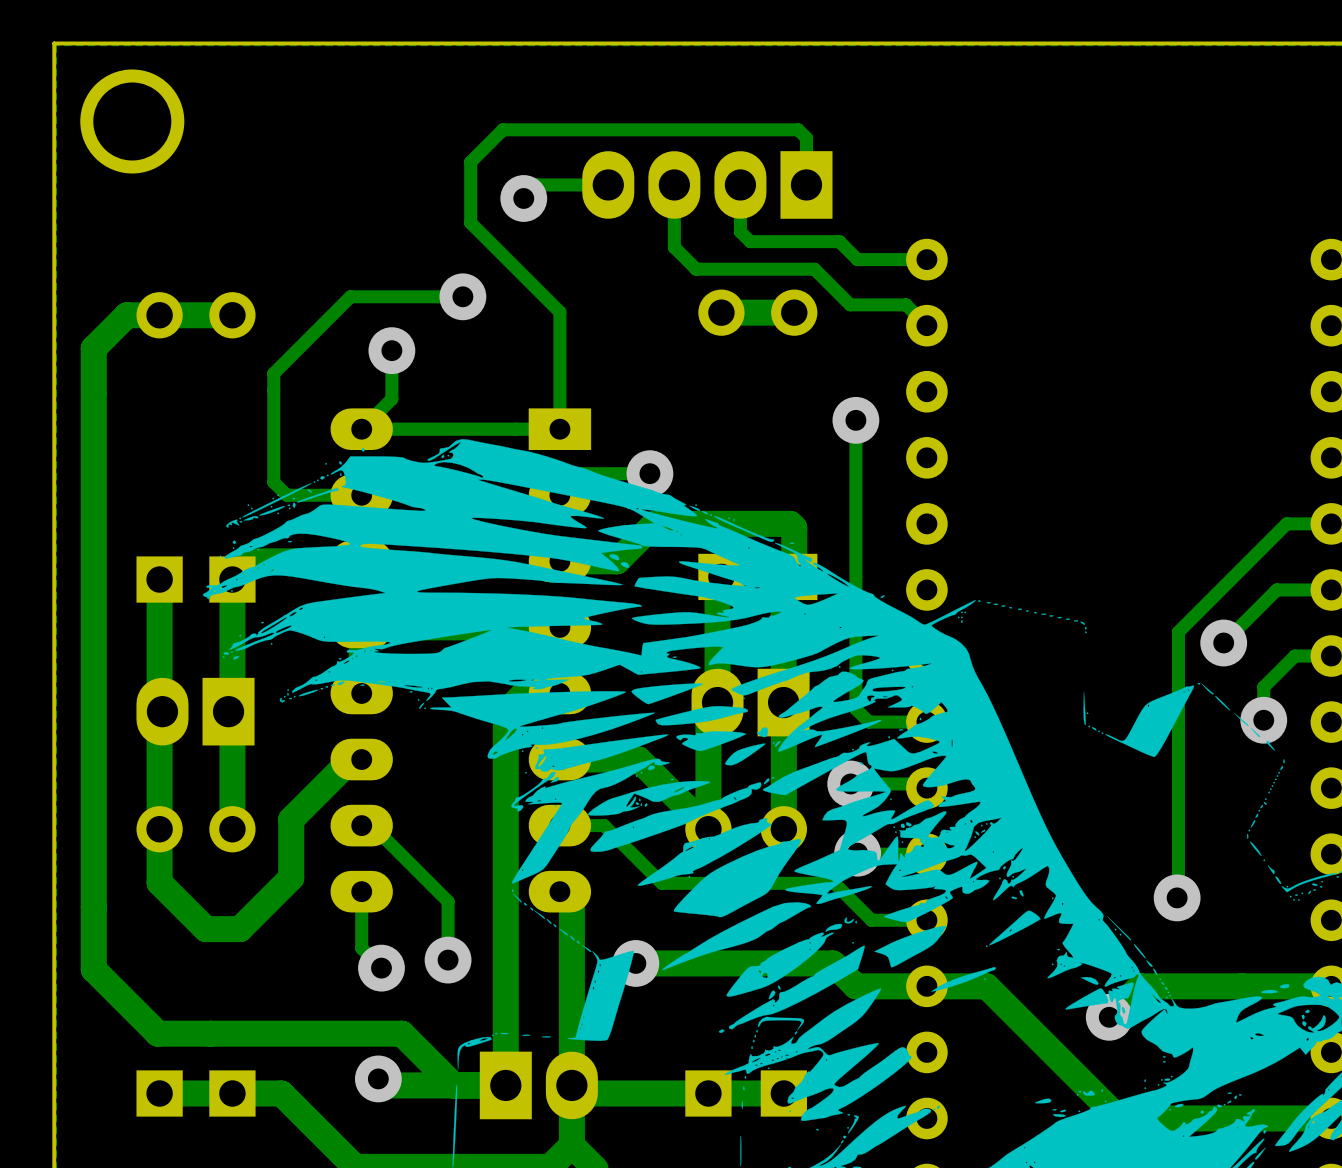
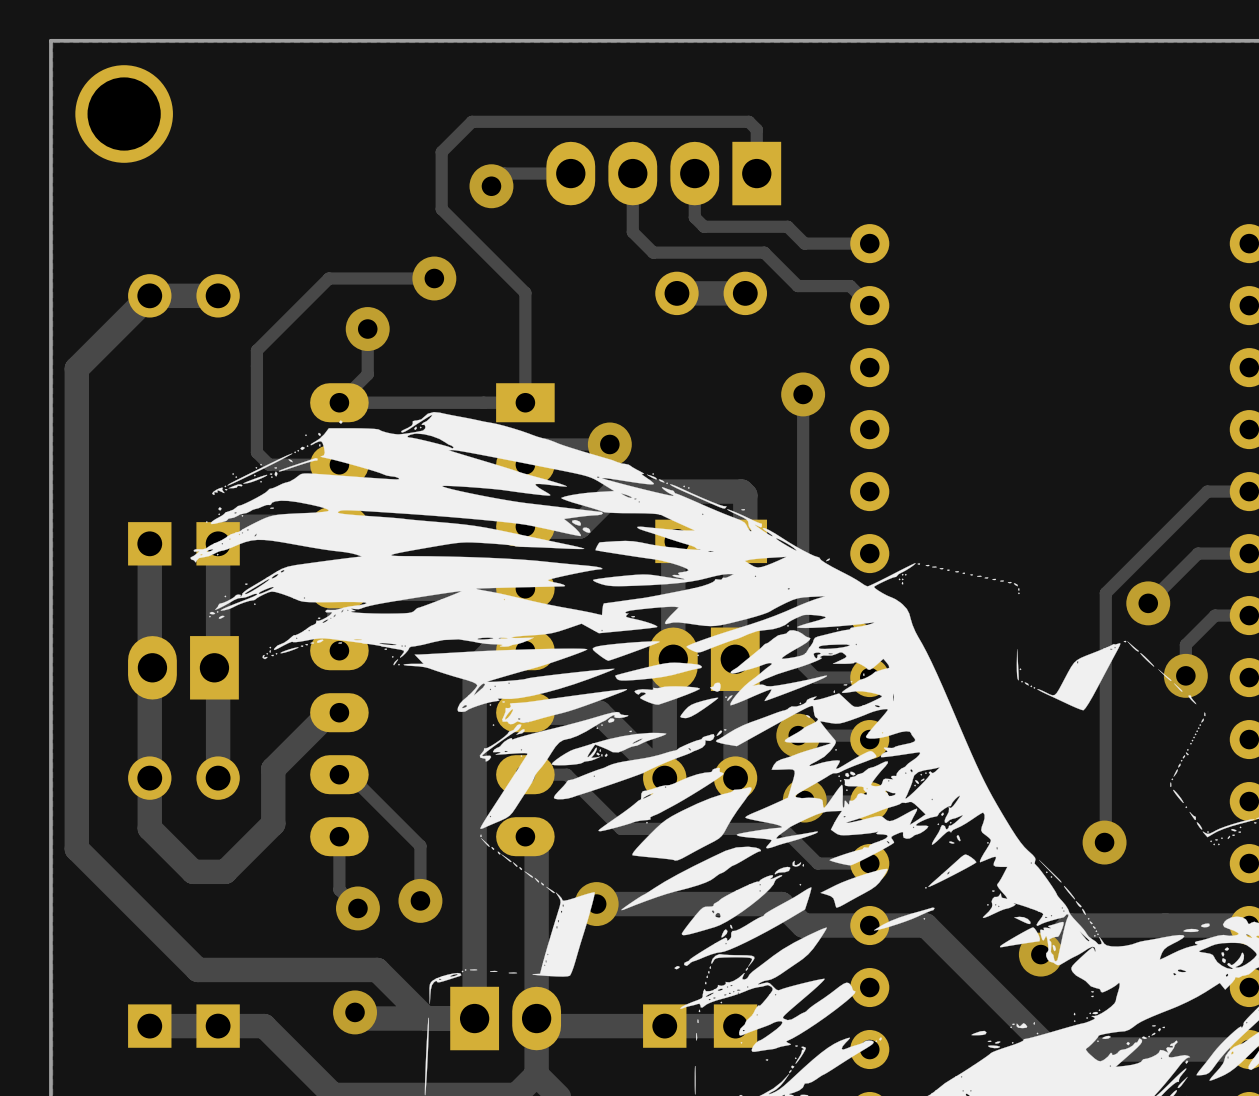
track: (159, 315) (126, 315) (93, 348) (93, 392) (91, 395) -> none
track: (93, 395) (93, 969) (157, 1033) (210, 1033) -> (149, 295) (76, 368) (76, 848) (197, 969)

